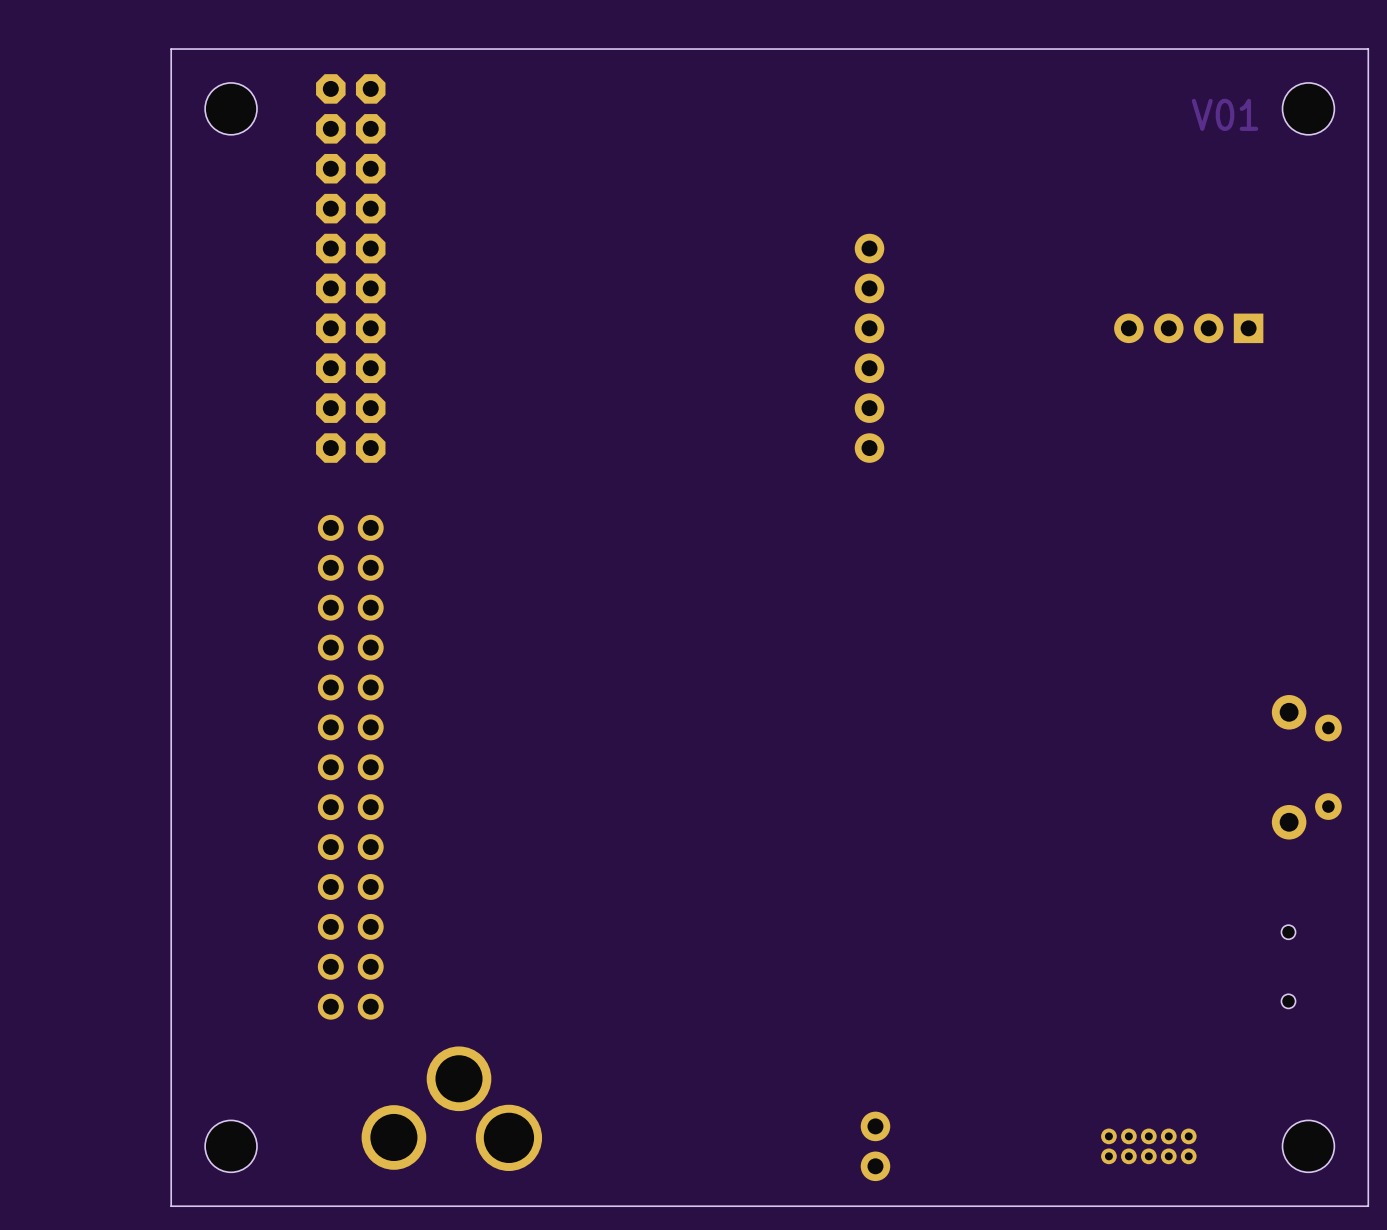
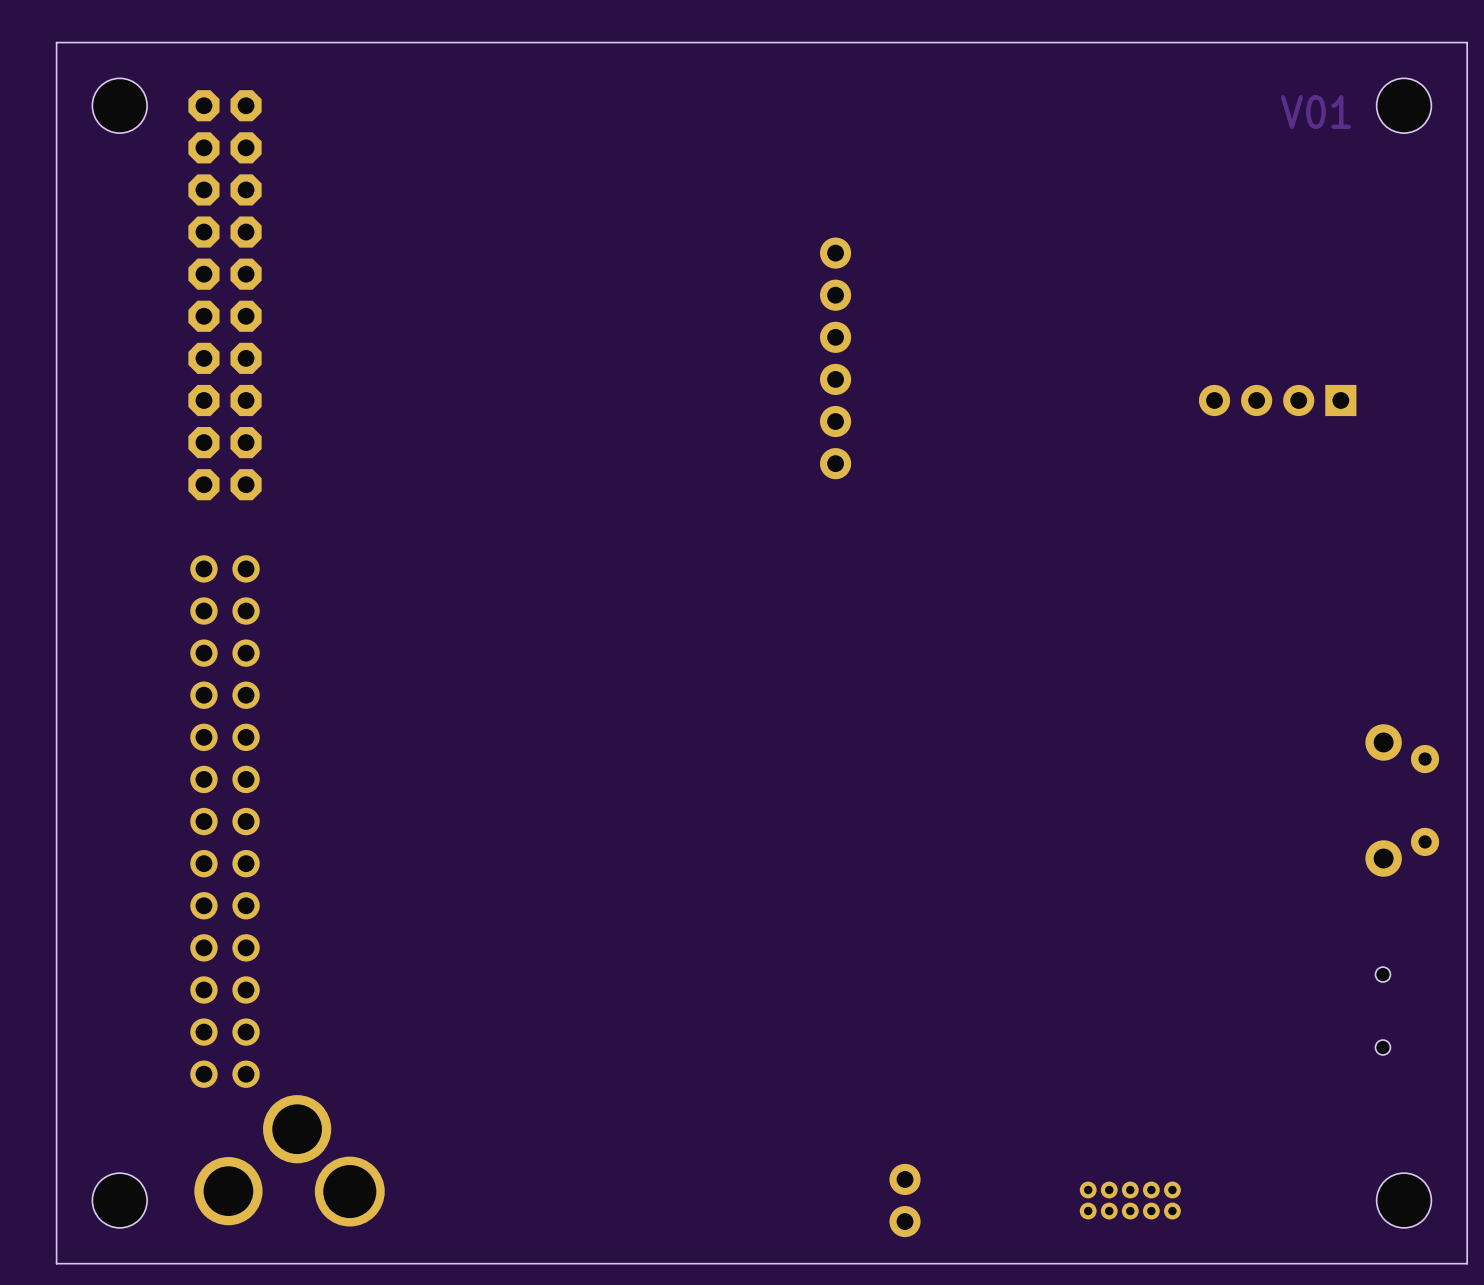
board edge: (171, 49) (171, 1206) -> (203, 42) (56, 42) (56, 1263) (203, 1263)
part position: (231, 108) -> (119, 105)
part position: (350, 268) -> (225, 295)
part position: (1188, 328) -> (1277, 400)
part position: (869, 348) -> (835, 358)
part position: (350, 767) -> (225, 821)
part position: (451, 1108) -> (289, 1160)
part position: (231, 1146) -> (119, 1200)
part position: (875, 1146) -> (905, 1200)
part: none -> (1130, 1200)
part: (1148, 1146) -> none

